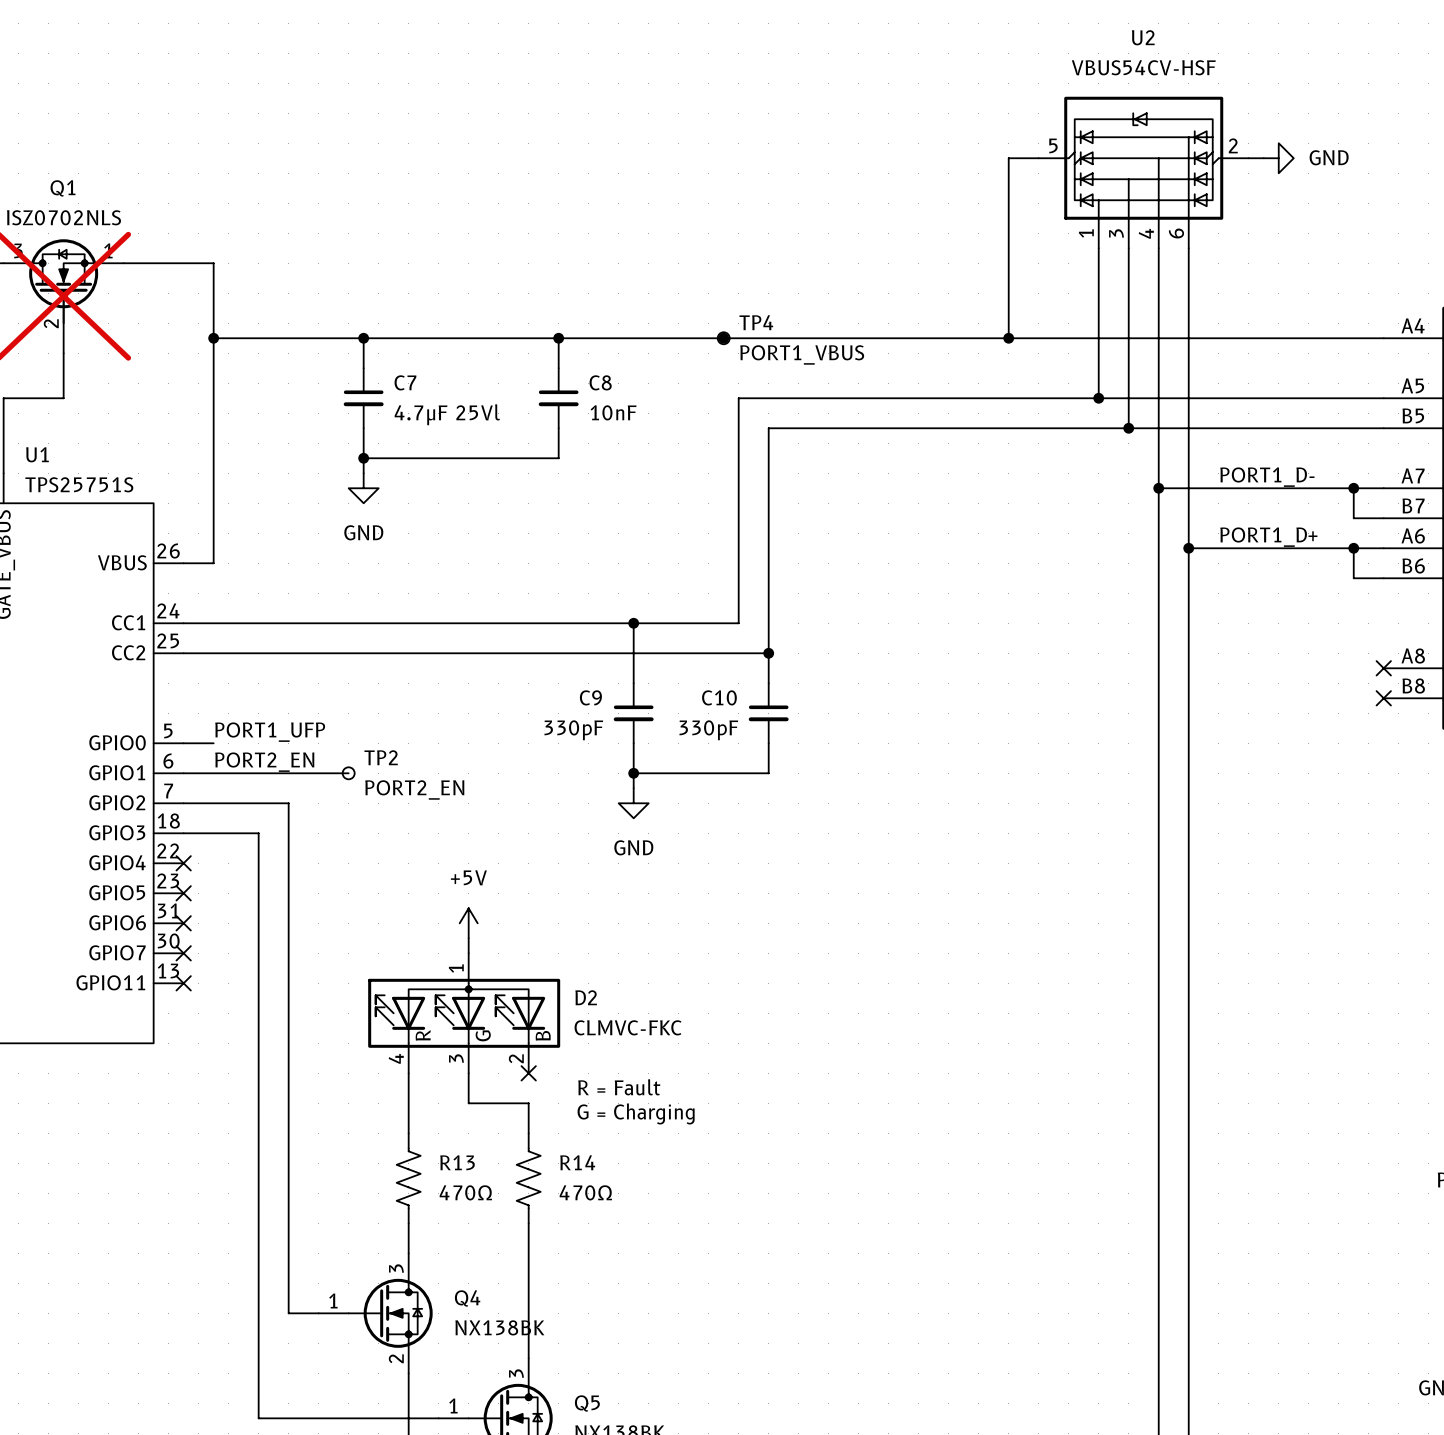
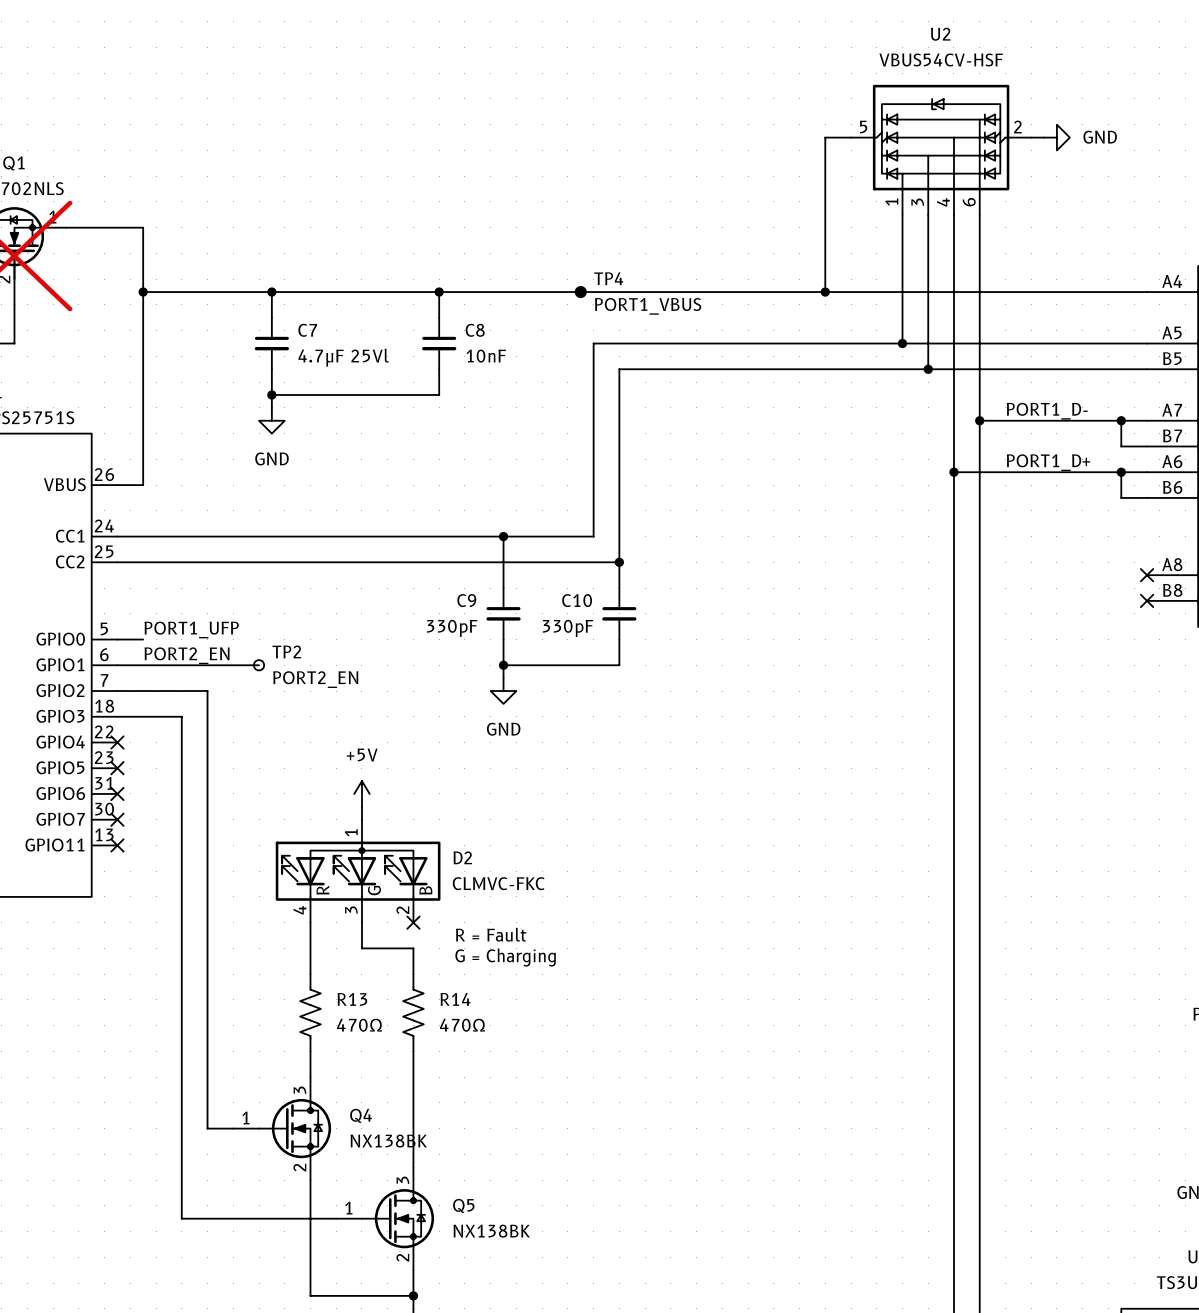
wire: (1158, 488) (1188, 488) -> (953, 472) (979, 472)
junction: (1158, 488) -> none
junction: none -> (979, 420)
junction: none -> (953, 472)
junction: (1188, 548) -> none

